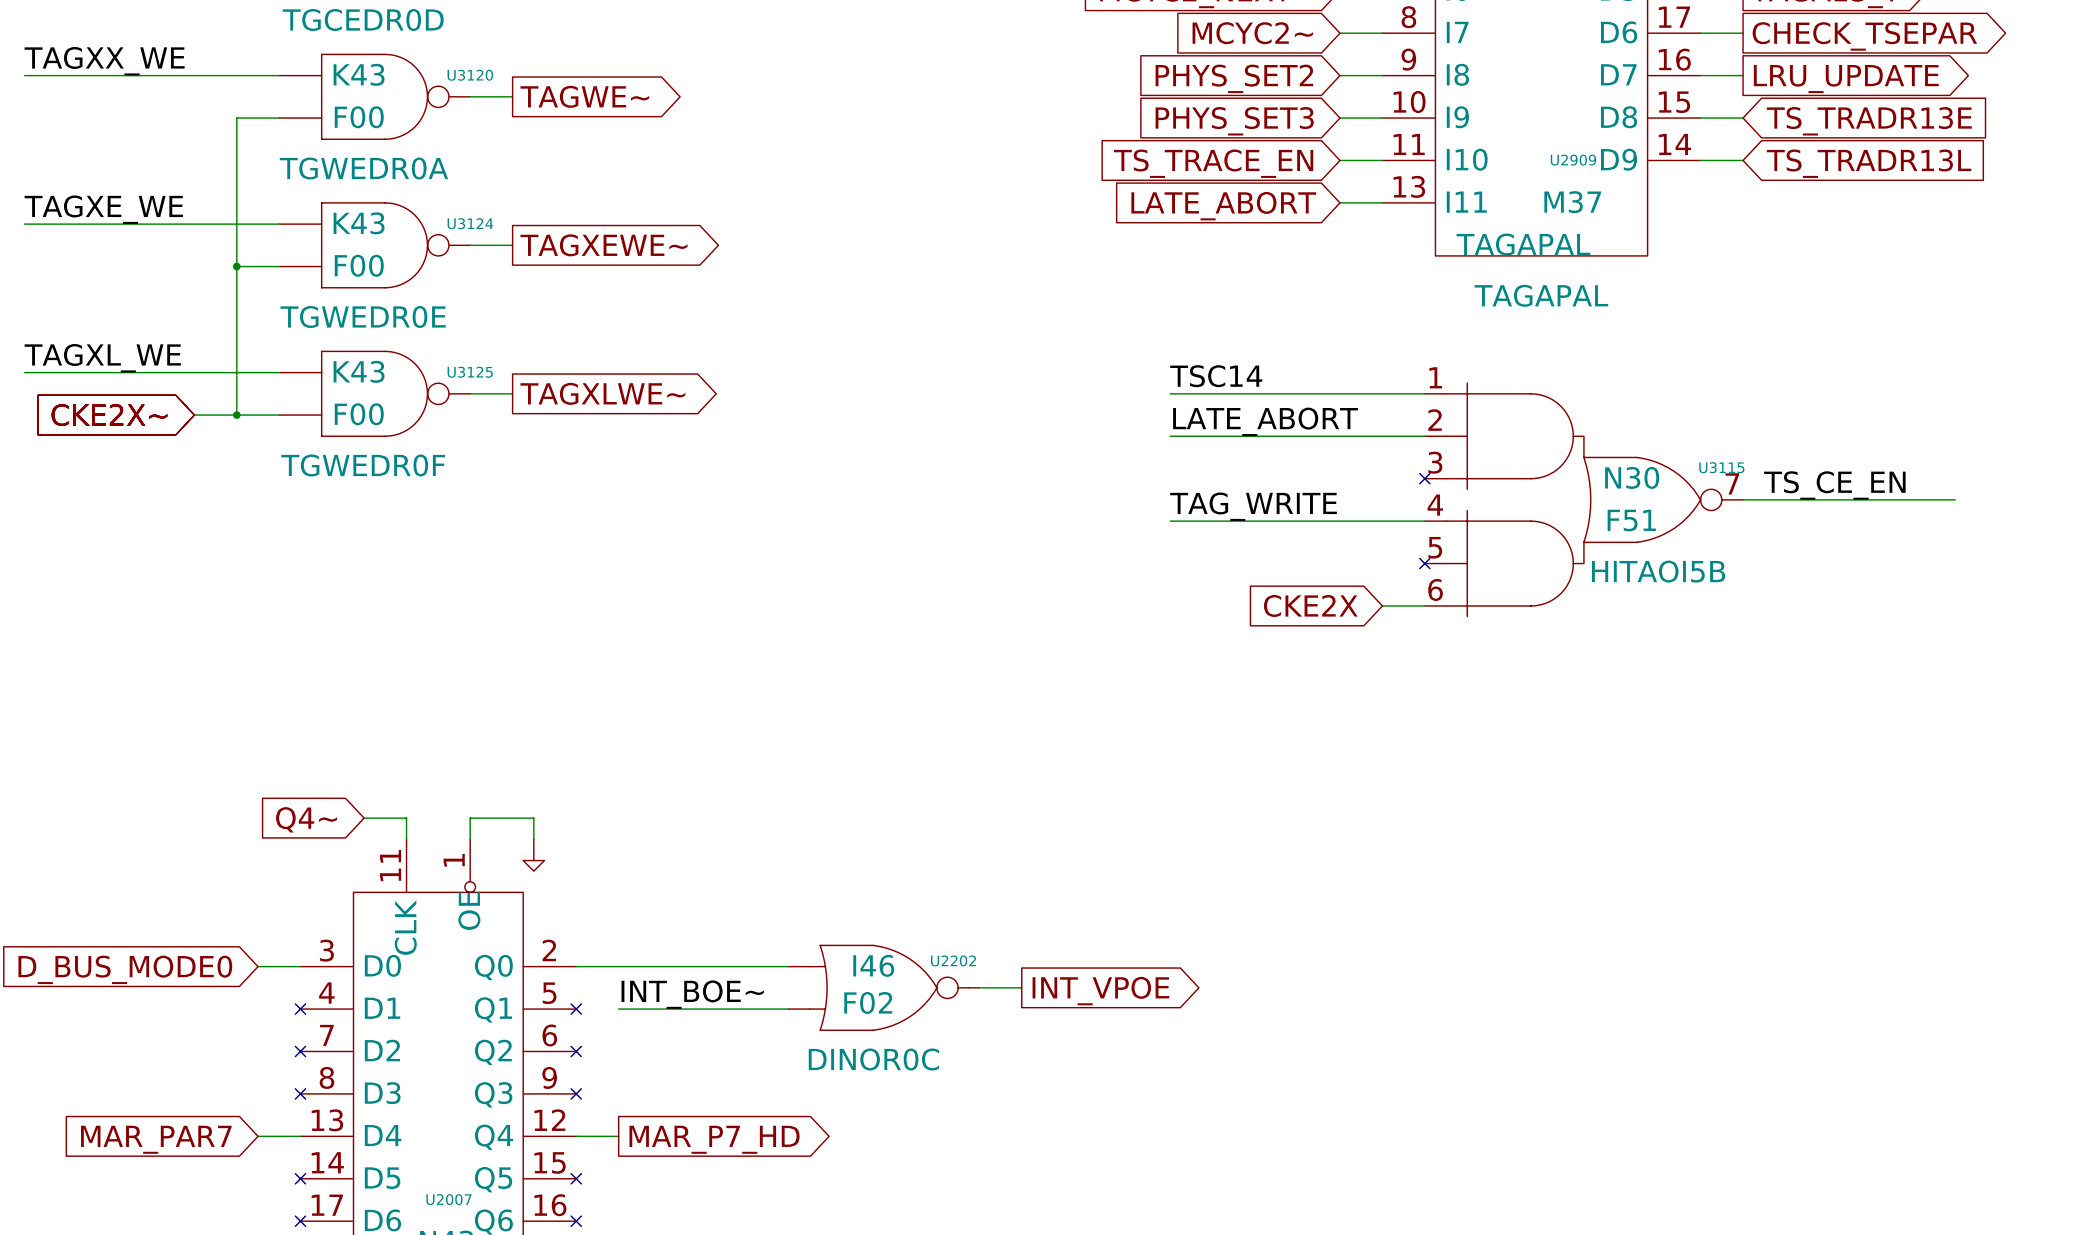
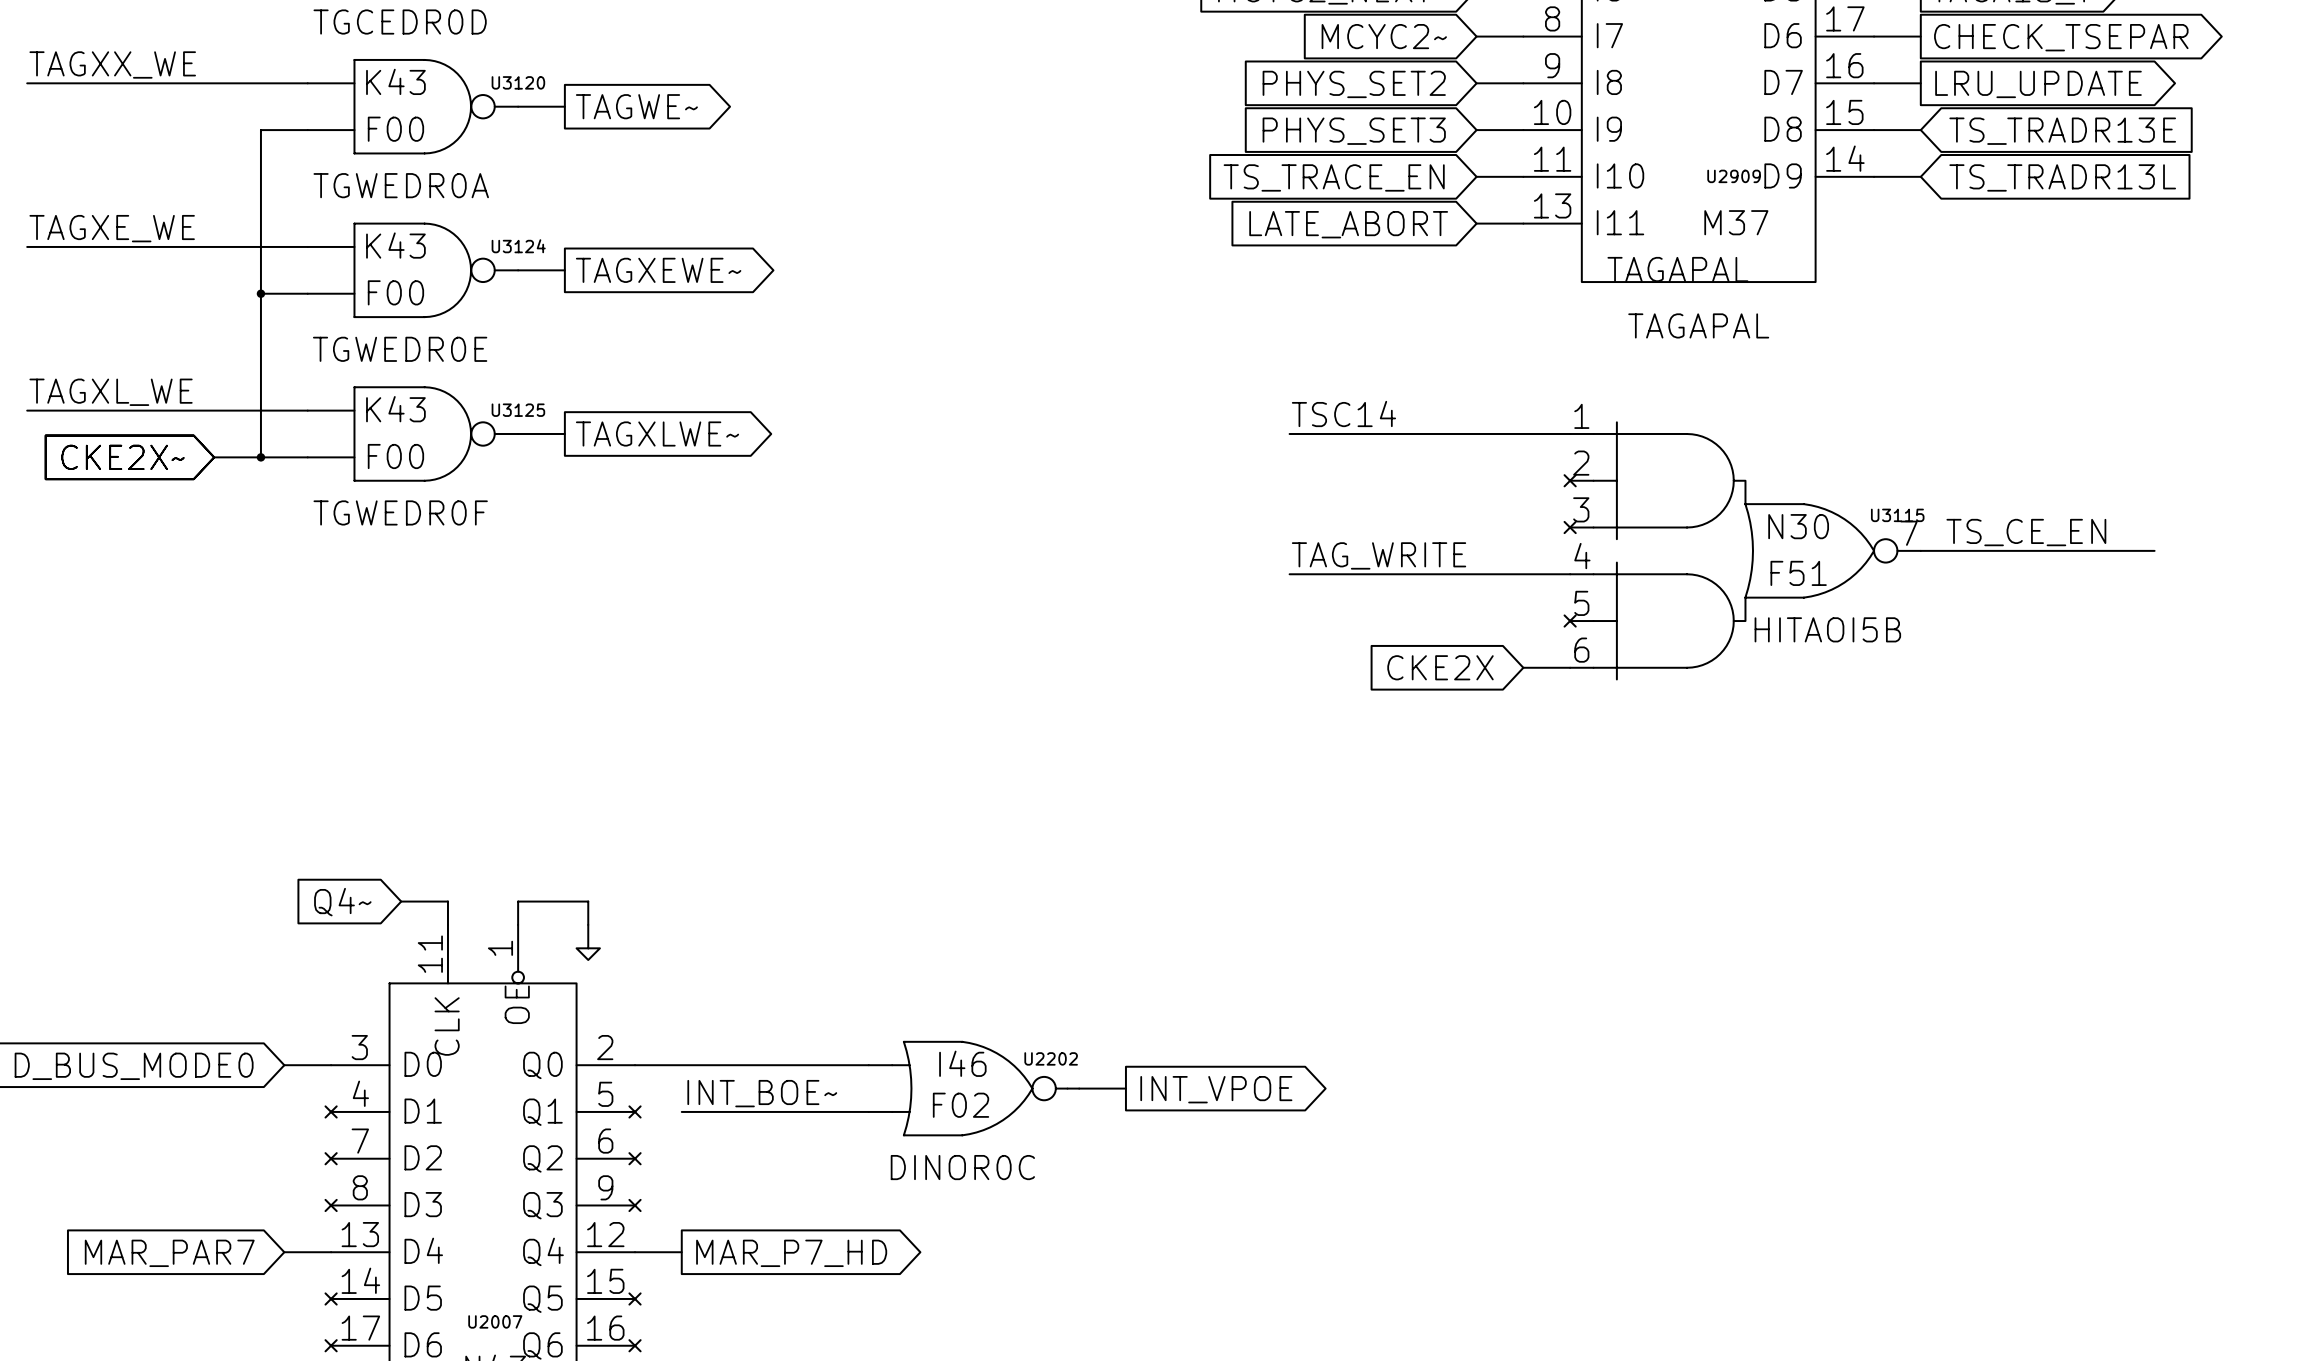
label: LATE_ABORT (1265, 421) -> none
wire: (1170, 436) (1424, 436) -> none
no-connect mark: none -> (1570, 480)

